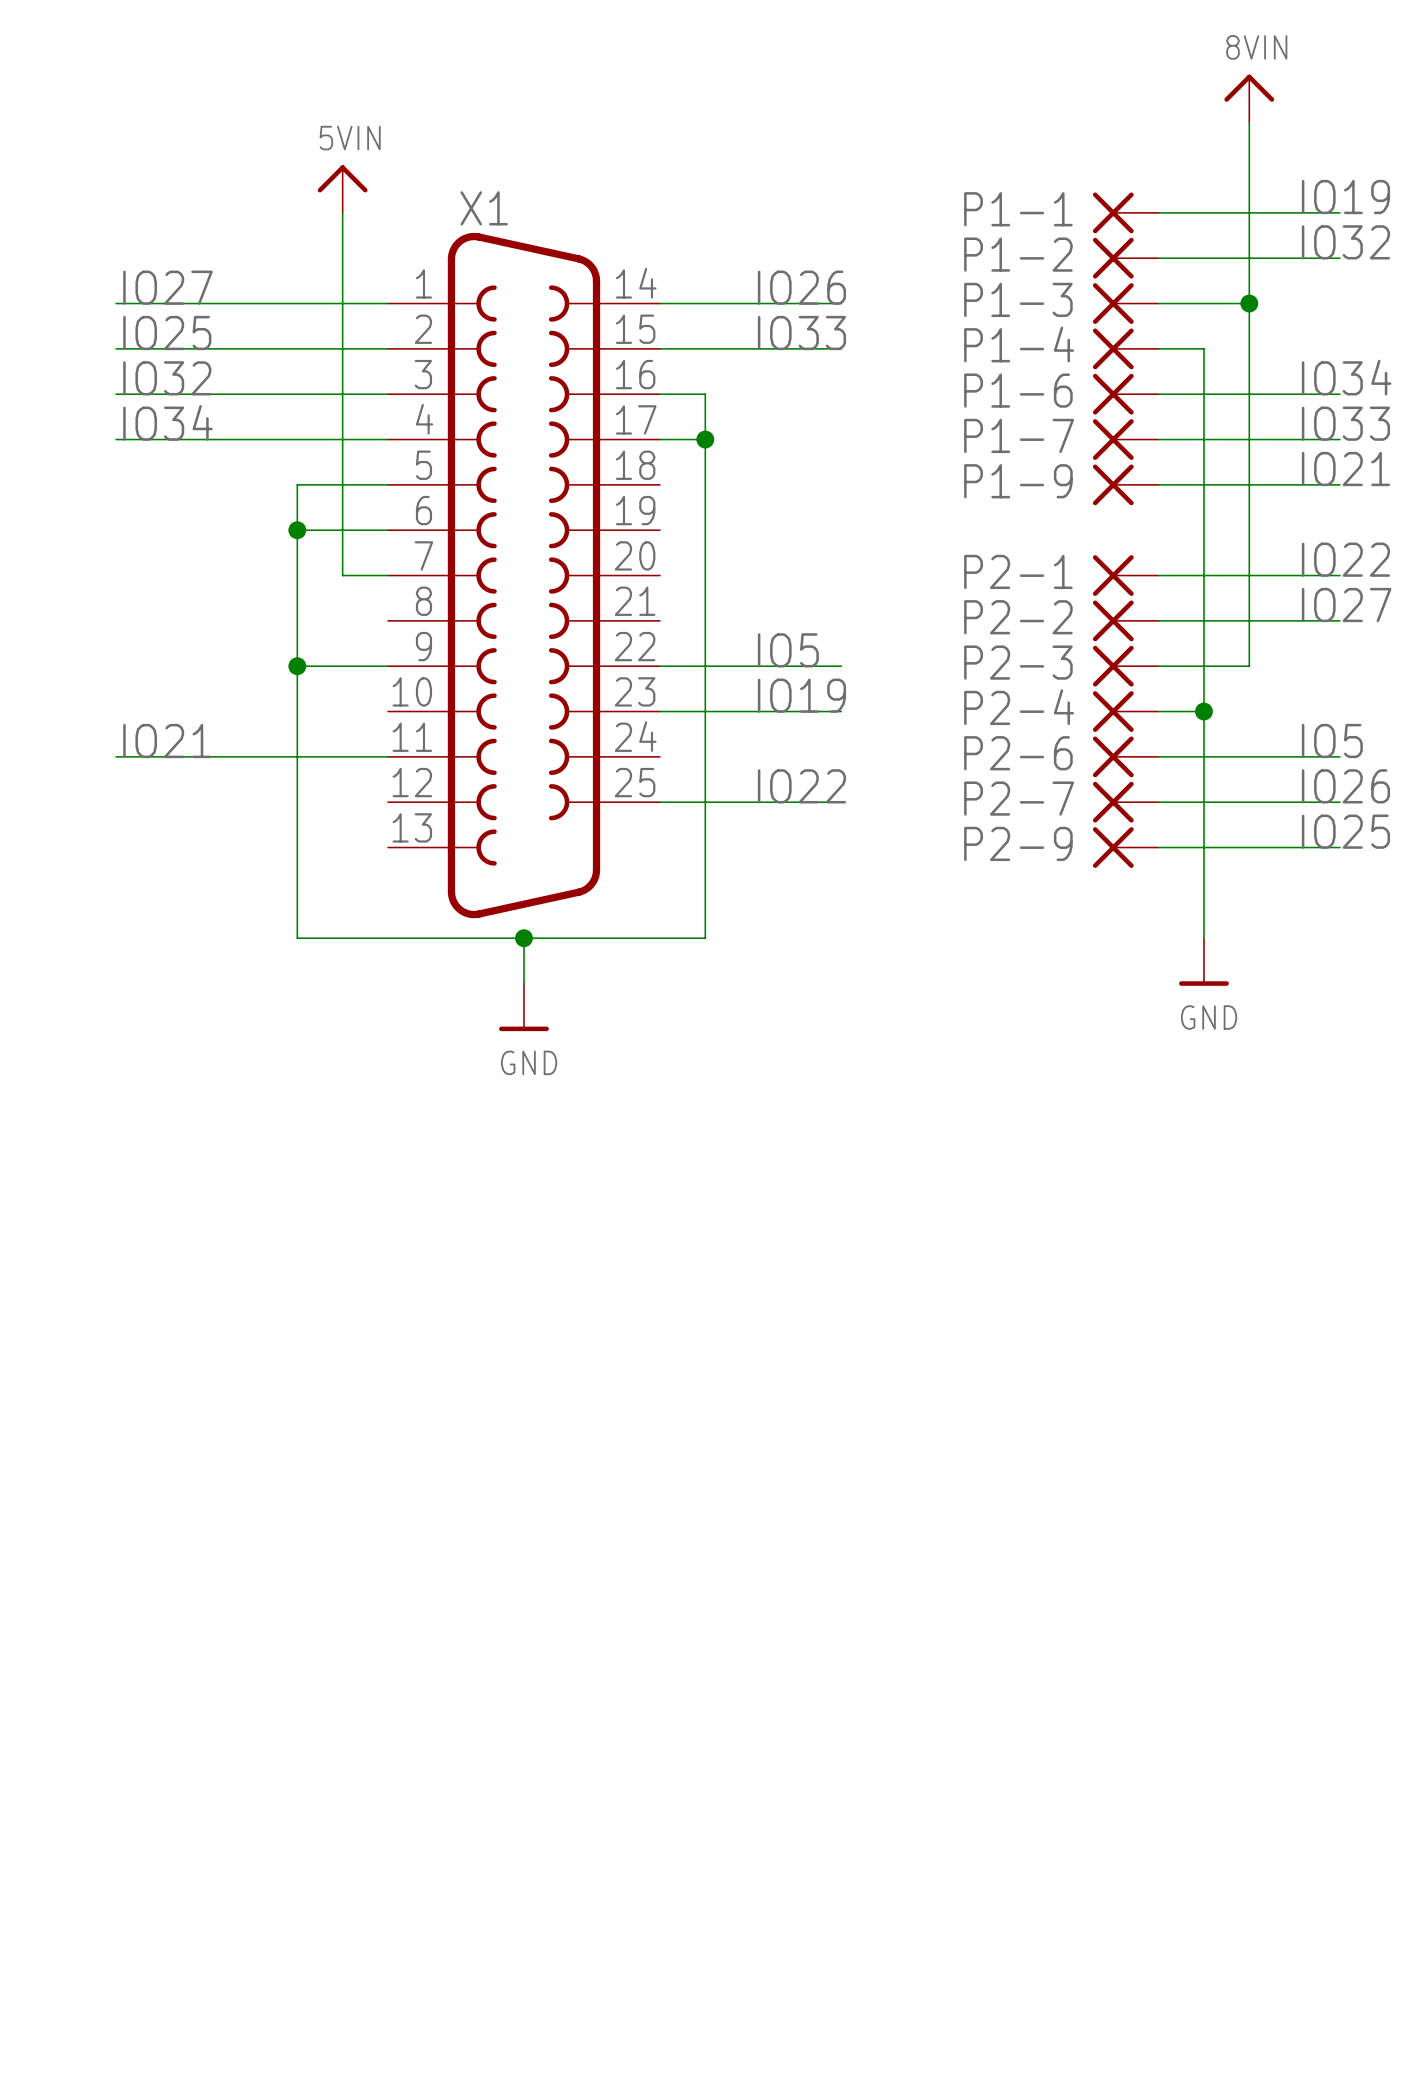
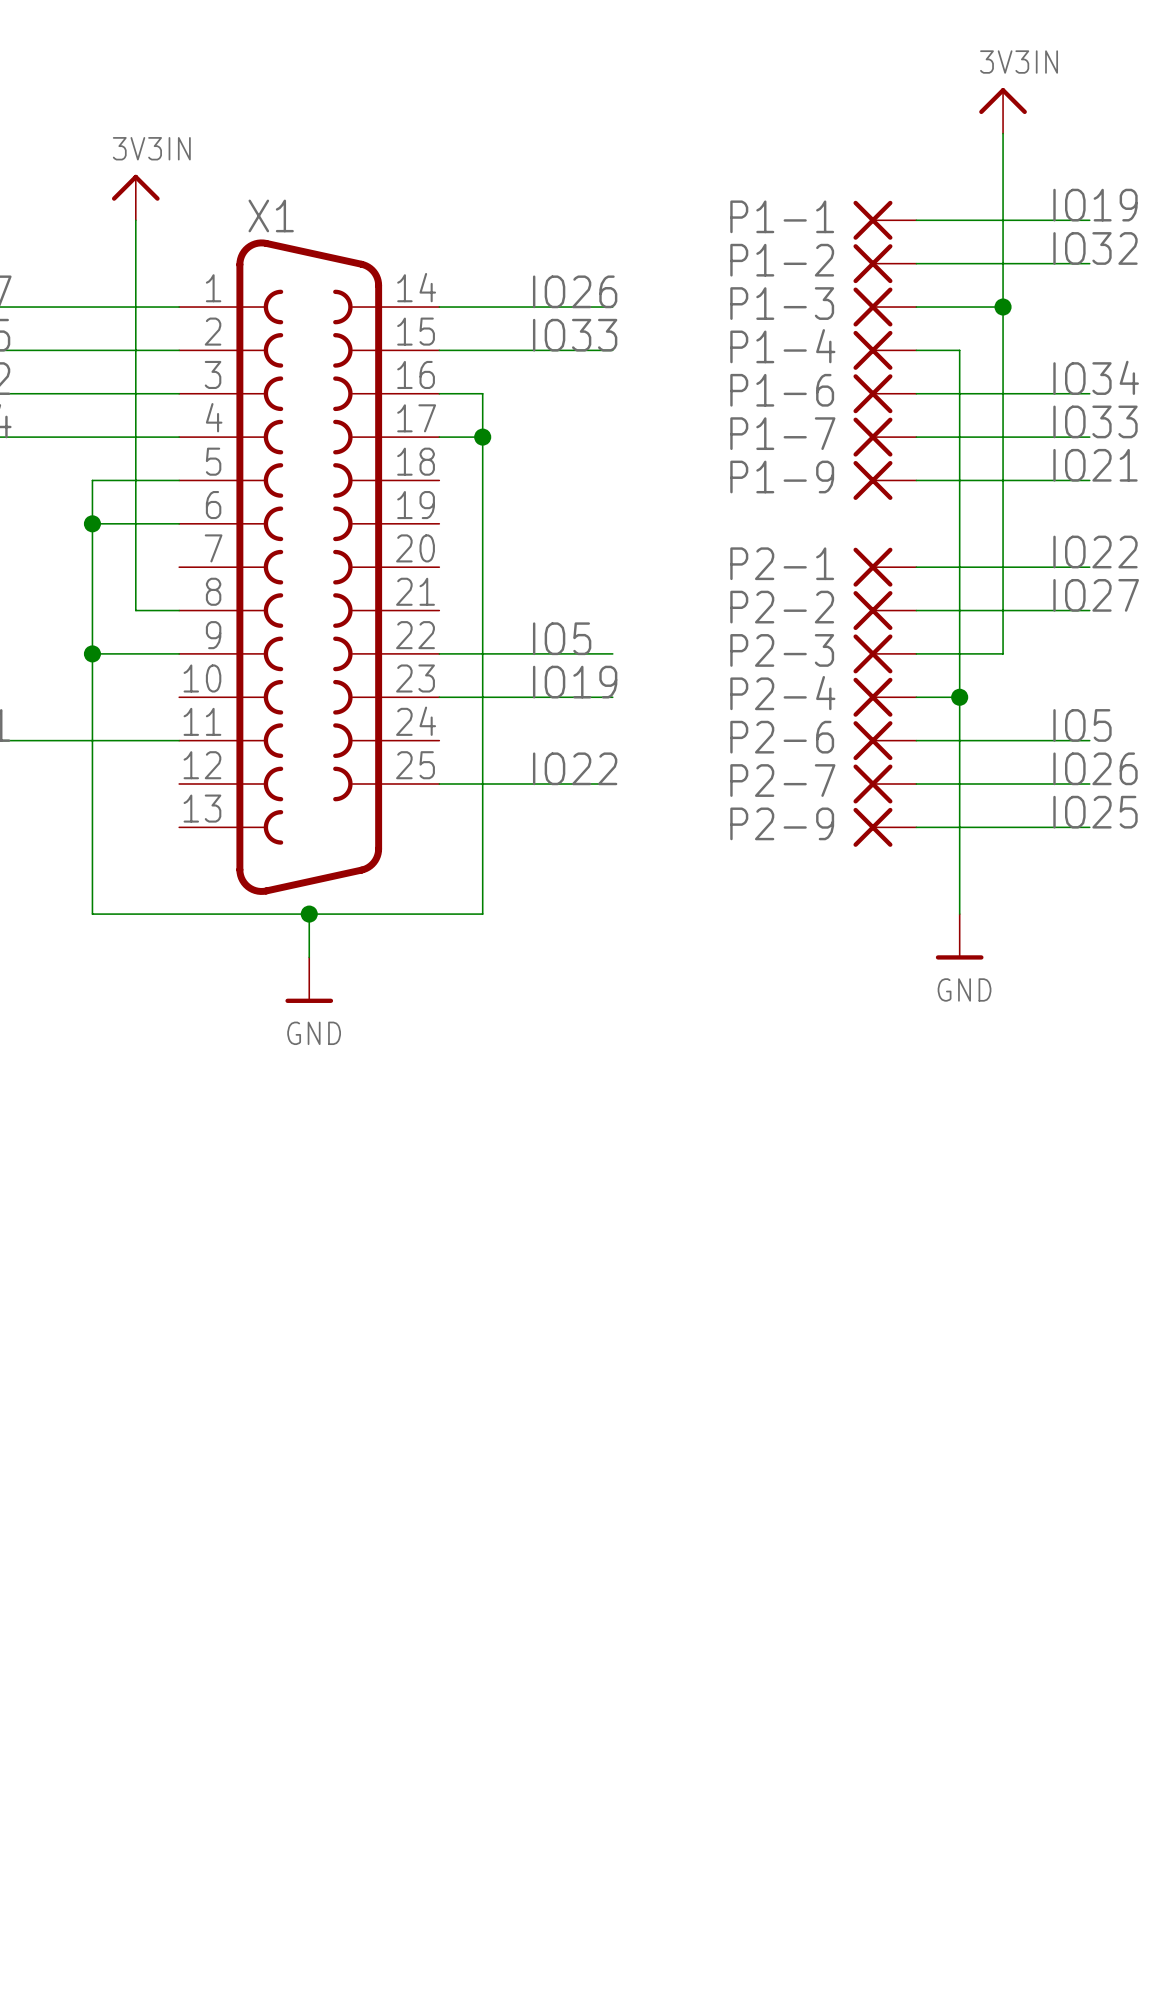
power symbol: 8VIN (1249, 98) -> 3V3IN (1003, 110)
power symbol: 5VIN (342, 189) -> 3V3IN (135, 197)
wire: (342, 575) (387, 575) -> (135, 567) (135, 610) (179, 610)

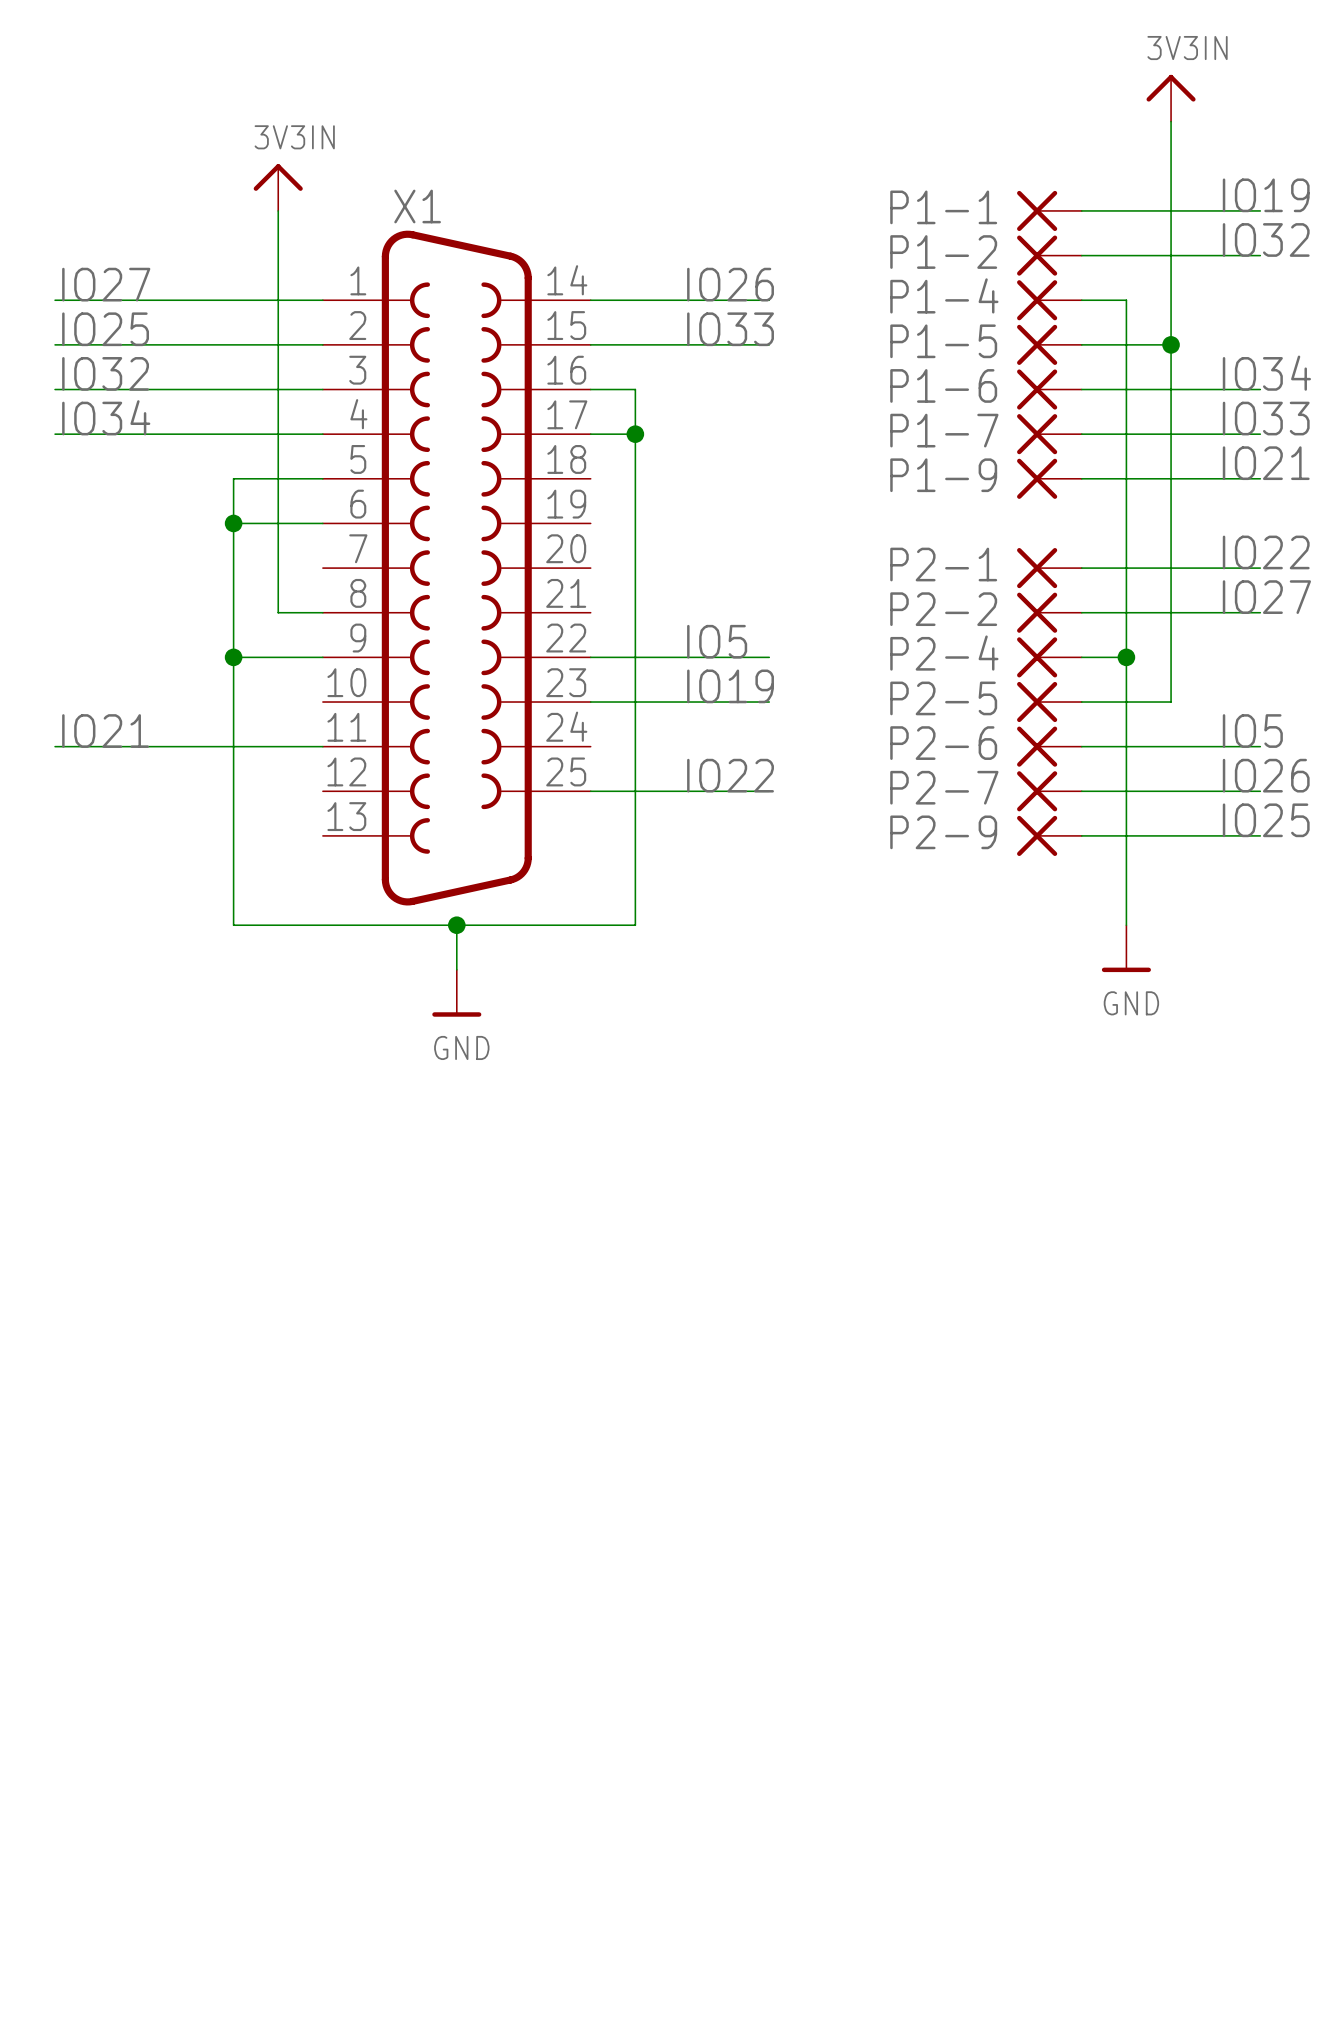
P1-3 name: P1-3 (782, 303) -> P1-4 (944, 295)
wire: (959, 307) (1003, 307) -> (1126, 300) (1126, 344) (1171, 344)
junction position: (1003, 307) -> (1171, 344)
P1-4 name: P1-4 (782, 346) -> P1-5 (943, 341)
P2-3 name: P2-3 (782, 650) -> P2-4 (944, 653)
wire: (959, 653) (1003, 653) -> (1126, 702) (1171, 702) (1171, 657)
P2-4 name: P2-4 (782, 693) -> P2-5 (943, 698)
junction position: (959, 697) -> (1126, 657)

